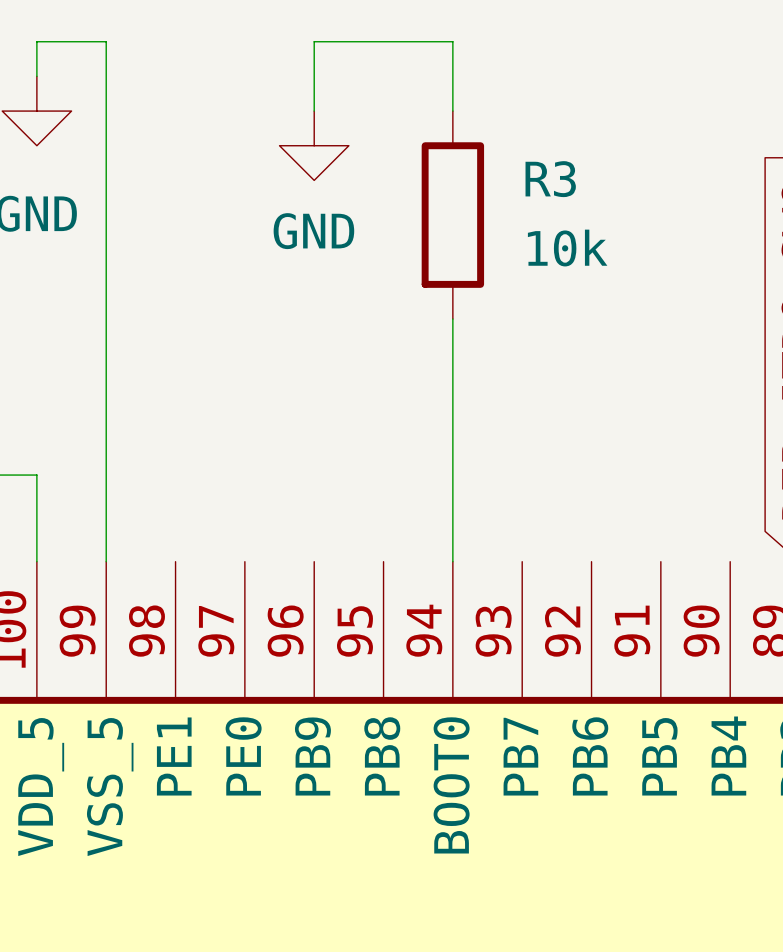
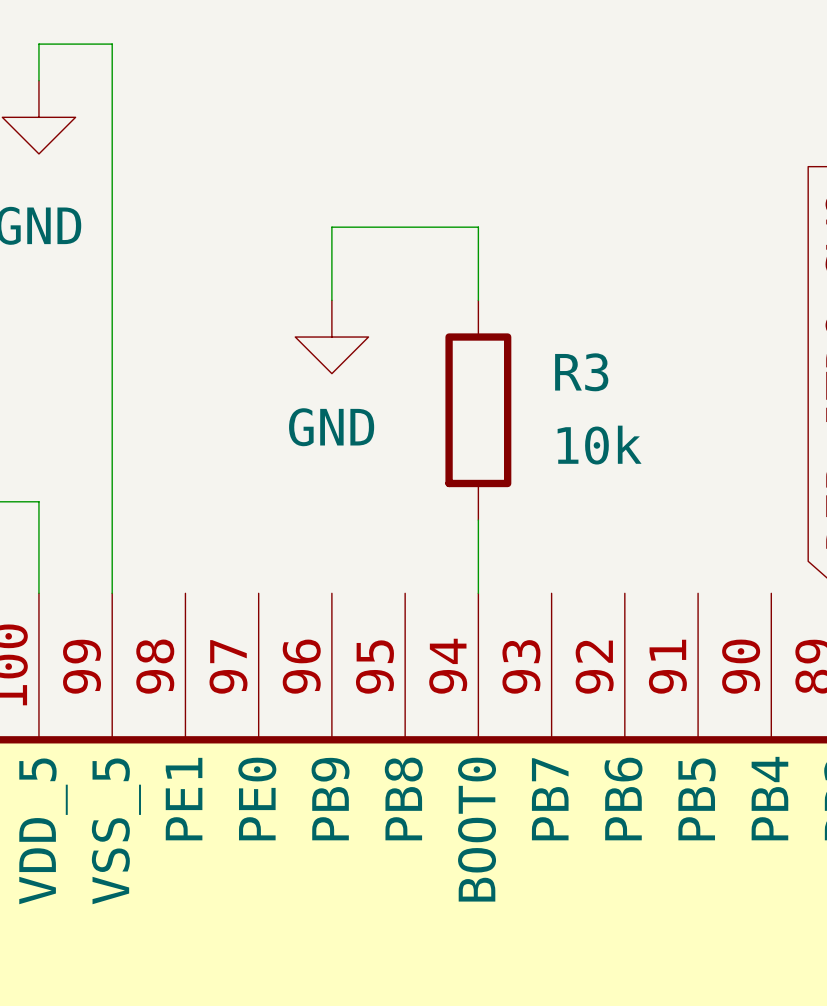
wire: (314, 111) (314, 41) (452, 41) (452, 111) -> (331, 300) (331, 227) (478, 227) (478, 300)
power symbol position: GND (314, 145) -> GND (331, 337)
R3 position: (452, 215) -> (478, 410)
wire: (452, 319) (452, 492) -> none

